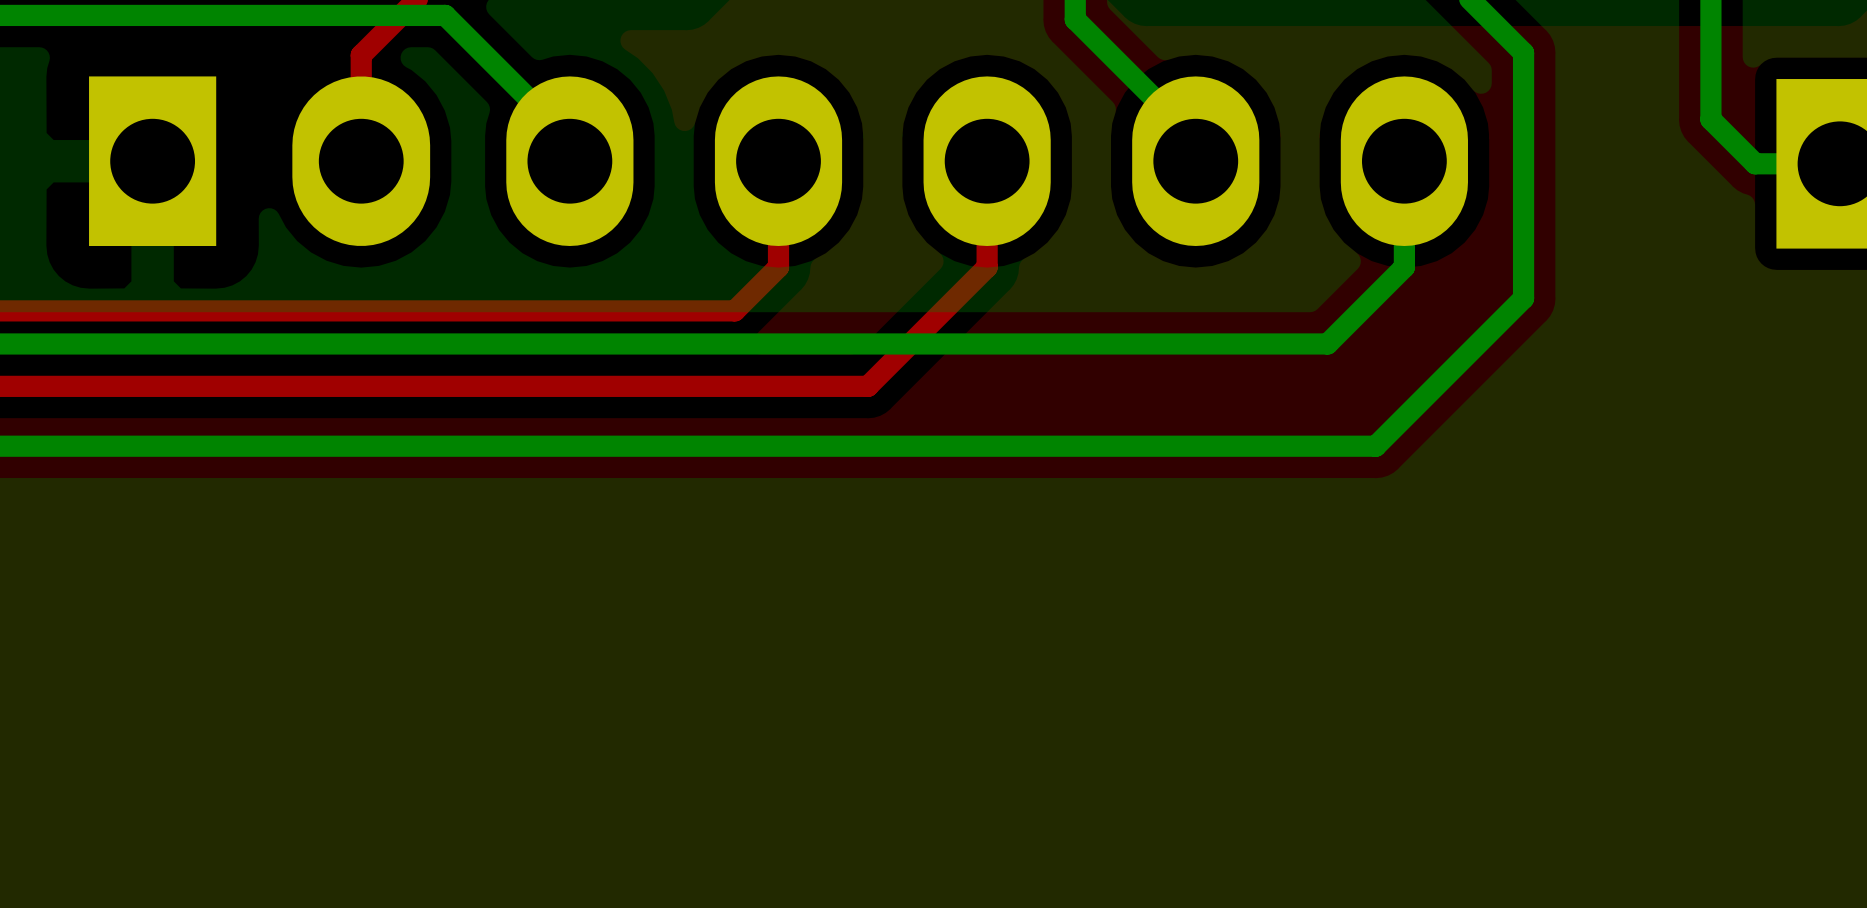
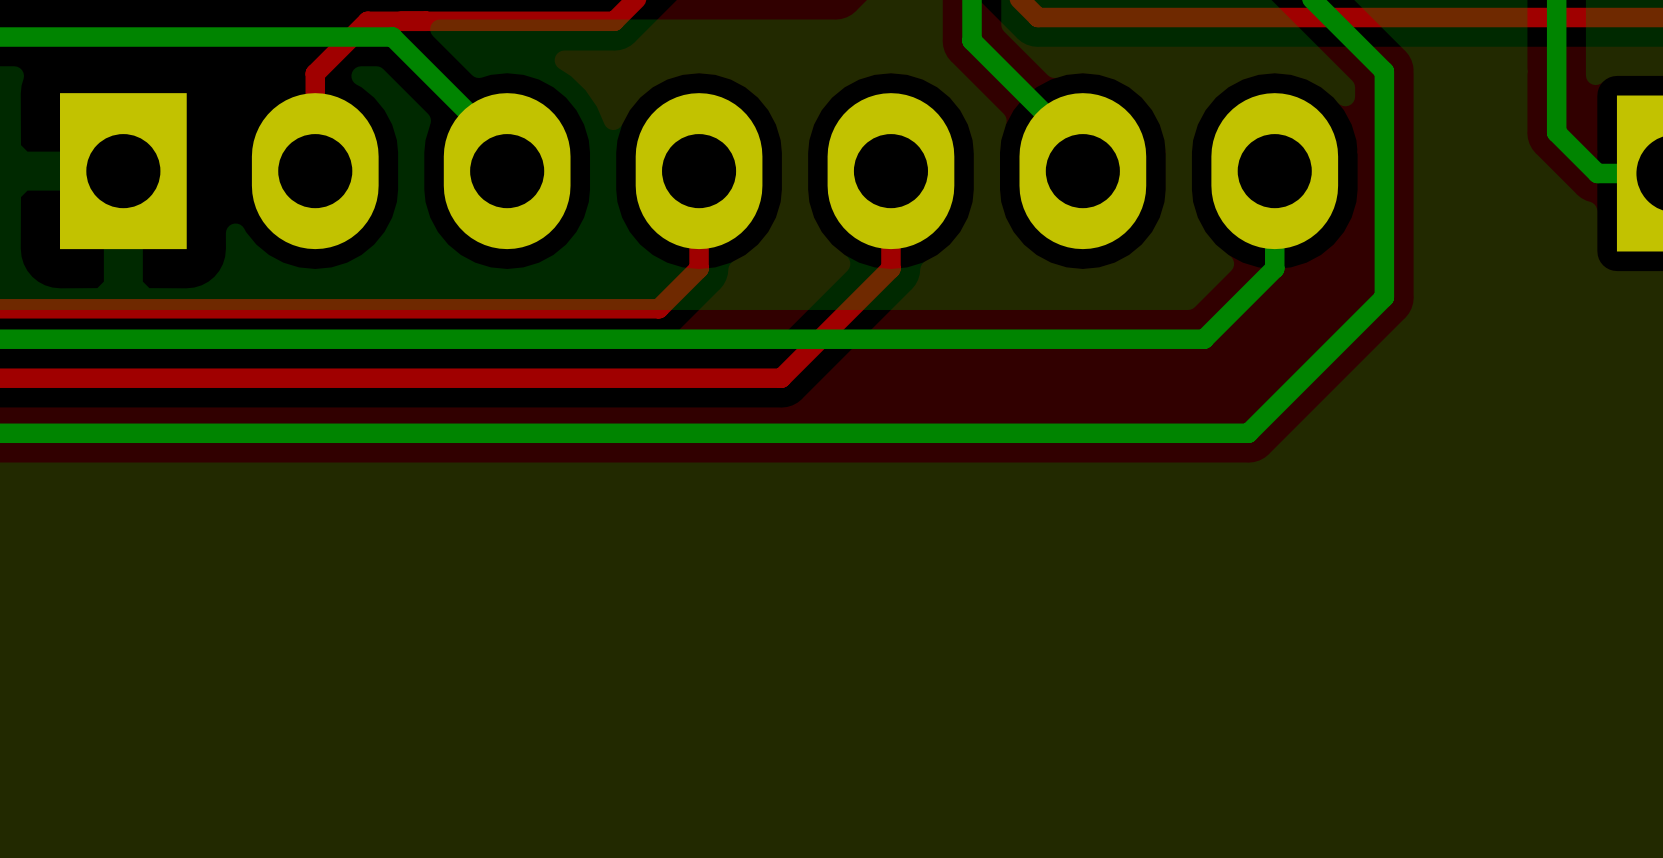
part footprint: [89, 76, 1468, 247] -> [60, 93, 1339, 250]

